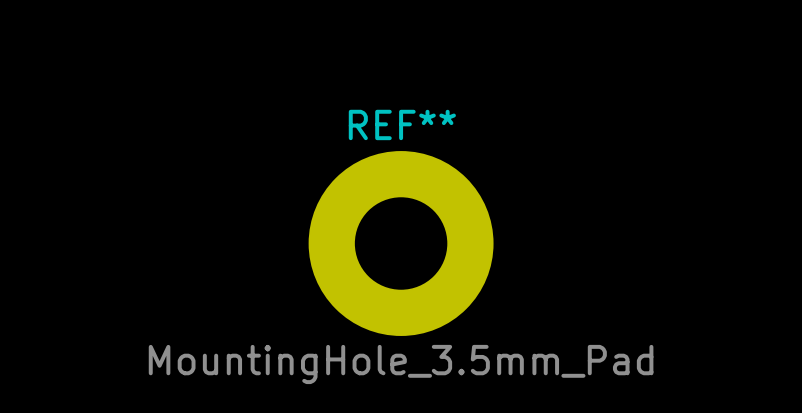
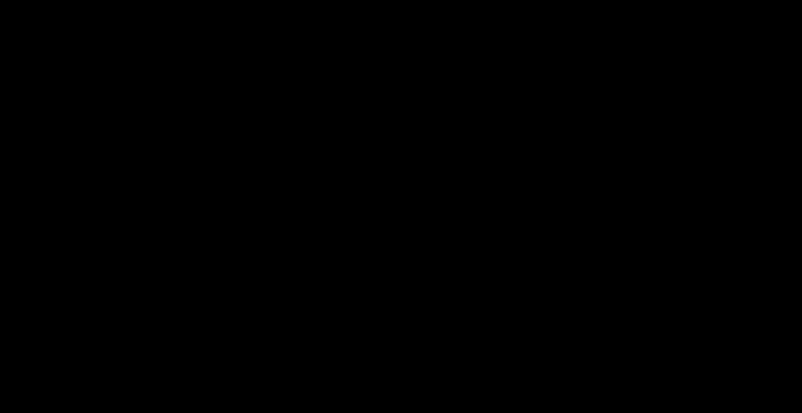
REF**: MountingHole_3.5mm_Pad (401, 243) -> none

